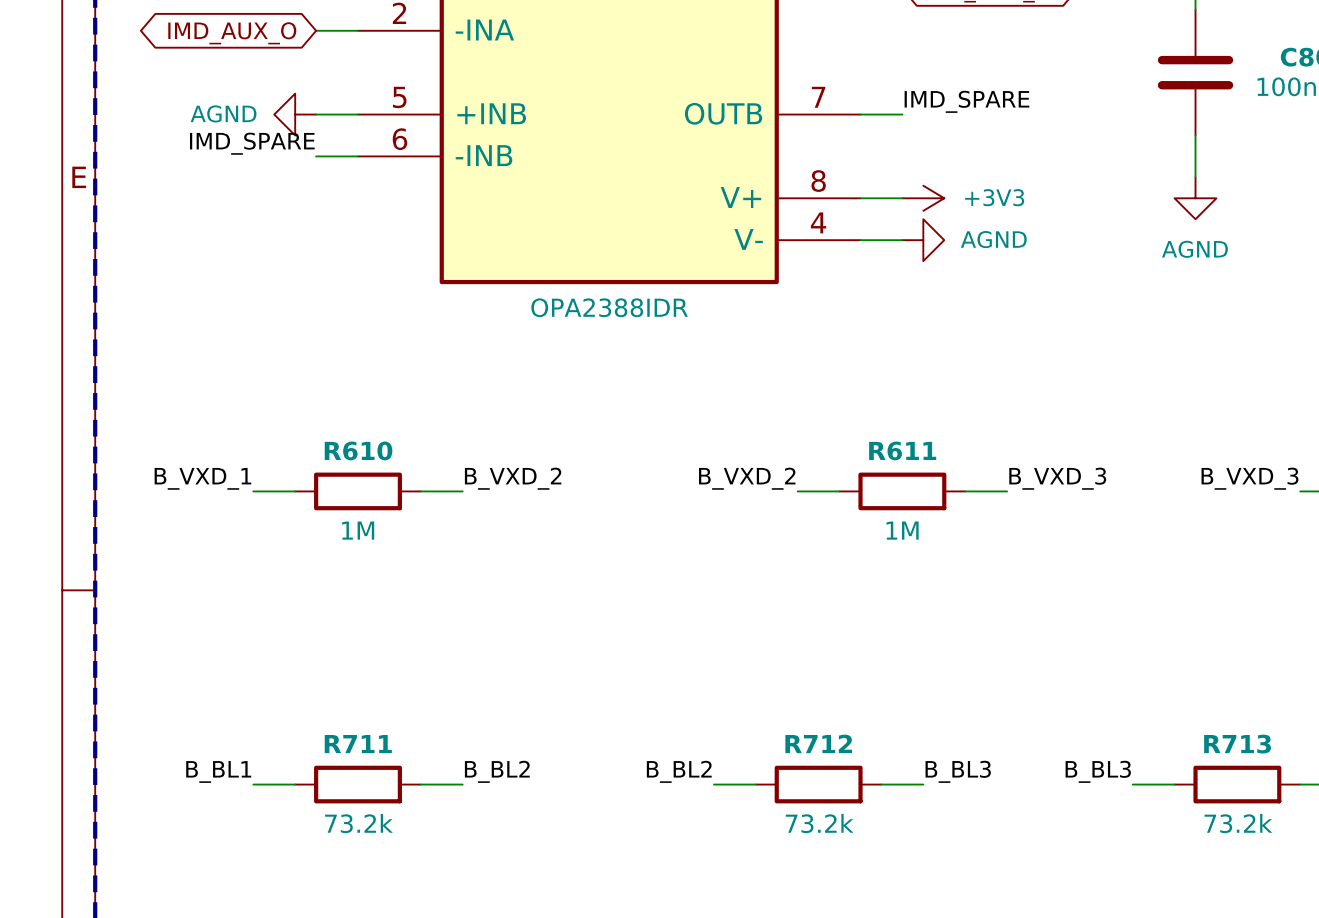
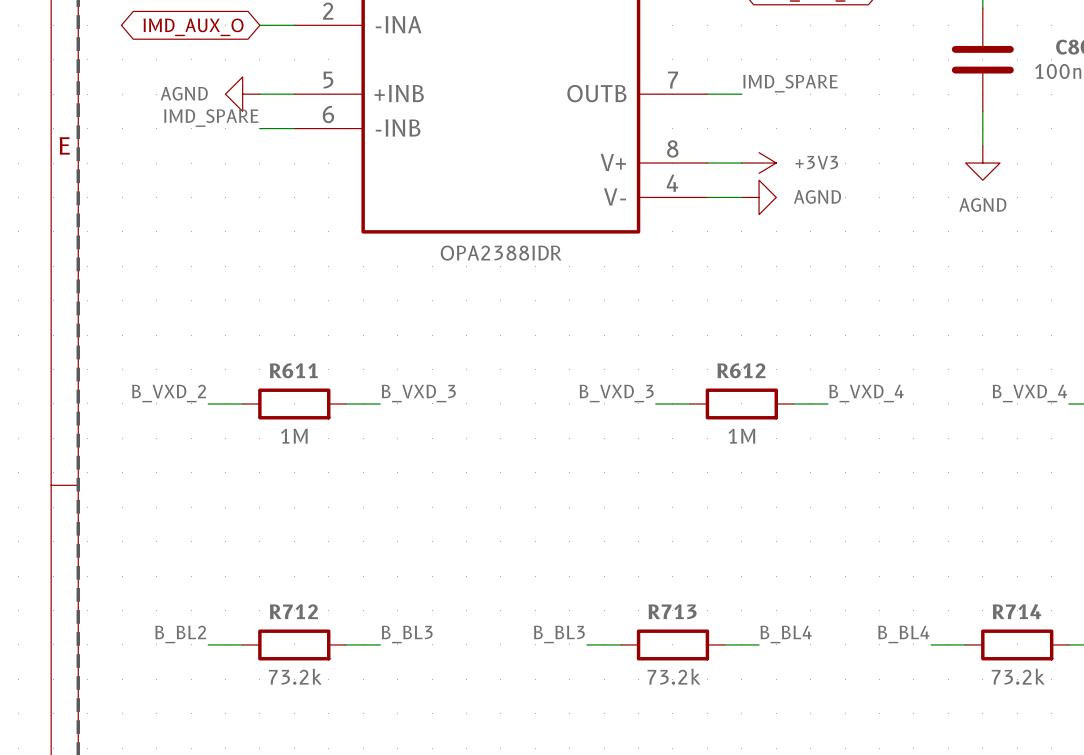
R610 name: R610 (358, 450) -> R611 (293, 370)
R611 name: R611 (902, 450) -> R612 (741, 370)
label: B_VXD_1 (202, 478) -> B_VXD_2 (169, 393)
label: B_VXD_2 (513, 478) -> B_VXD_3 (418, 393)
label: B_VXD_2 (747, 478) -> B_VXD_3 (616, 393)
label: B_VXD_3 (1057, 478) -> B_VXD_4 (866, 393)
label: B_VXD_3 (1249, 478) -> B_VXD_4 (1029, 393)
R712 name: R712 (818, 743) -> R713 (672, 611)
R711 name: R711 (358, 744) -> R712 (293, 611)
R713 name: R713 (1237, 744) -> R714 (1016, 611)
label: B_BL1 (218, 771) -> B_BL2 (180, 634)
label: B_BL2 (497, 771) -> B_BL3 (407, 634)
label: B_BL2 (679, 771) -> B_BL3 (559, 634)
label: B_BL3 (958, 771) -> B_BL4 (786, 634)
label: B_BL3 (1098, 771) -> B_BL4 (903, 634)

